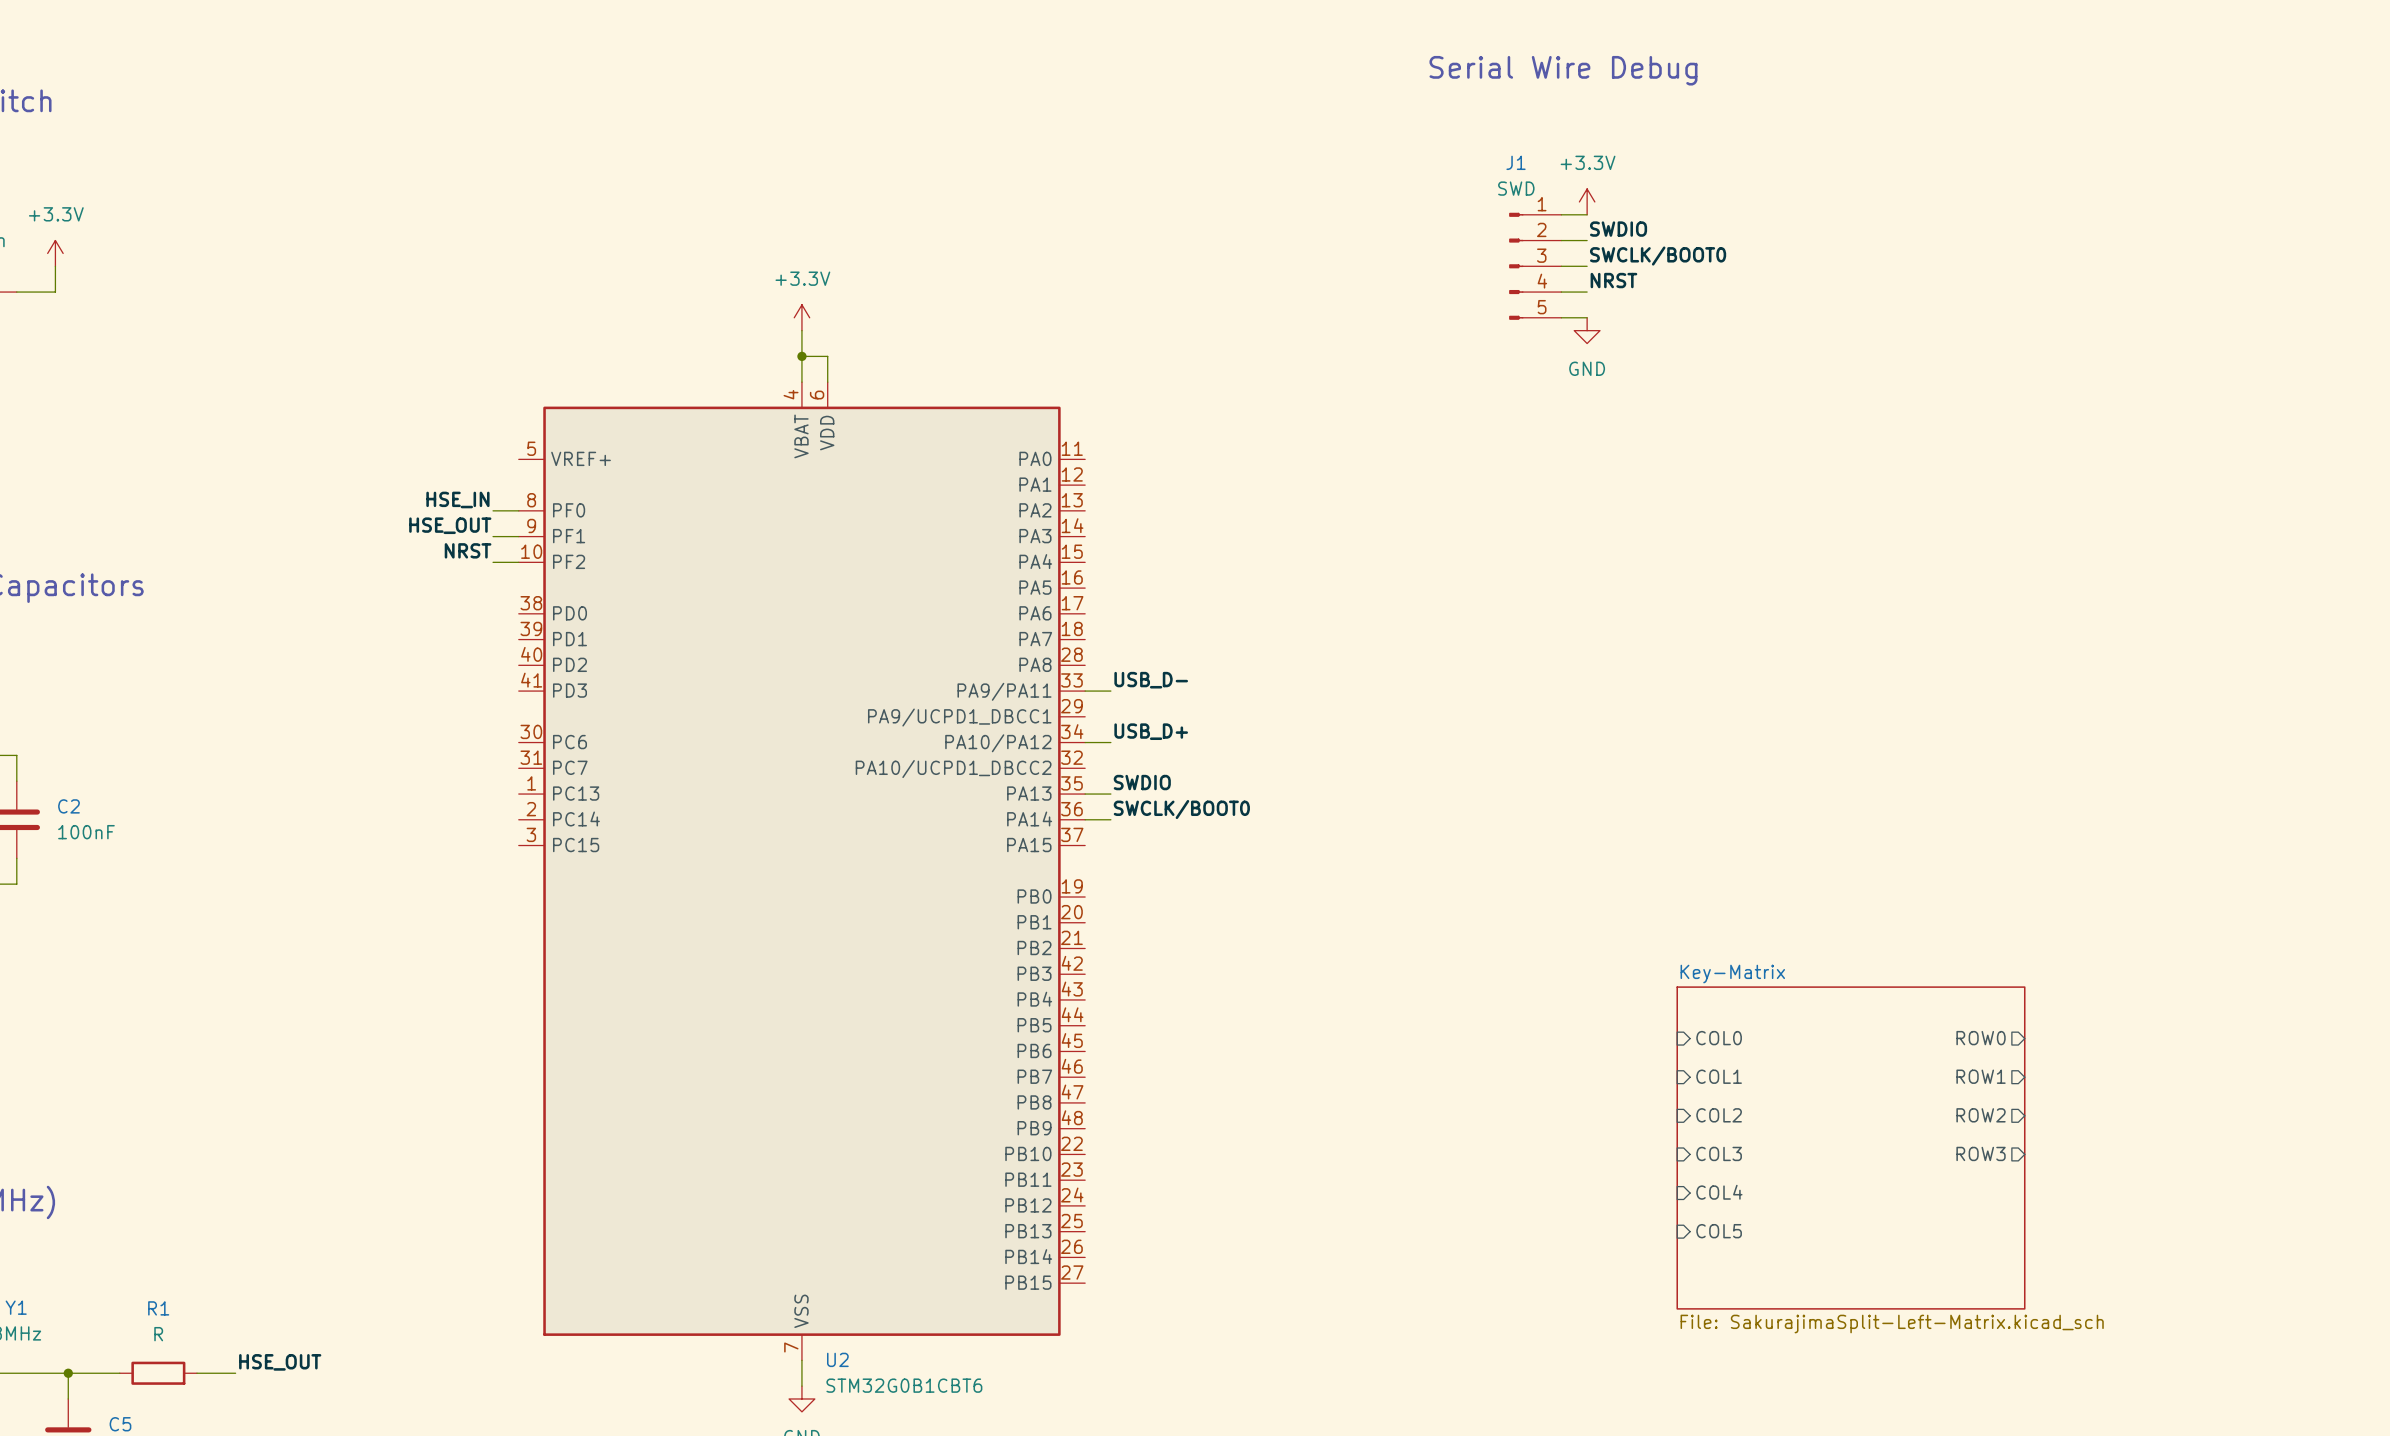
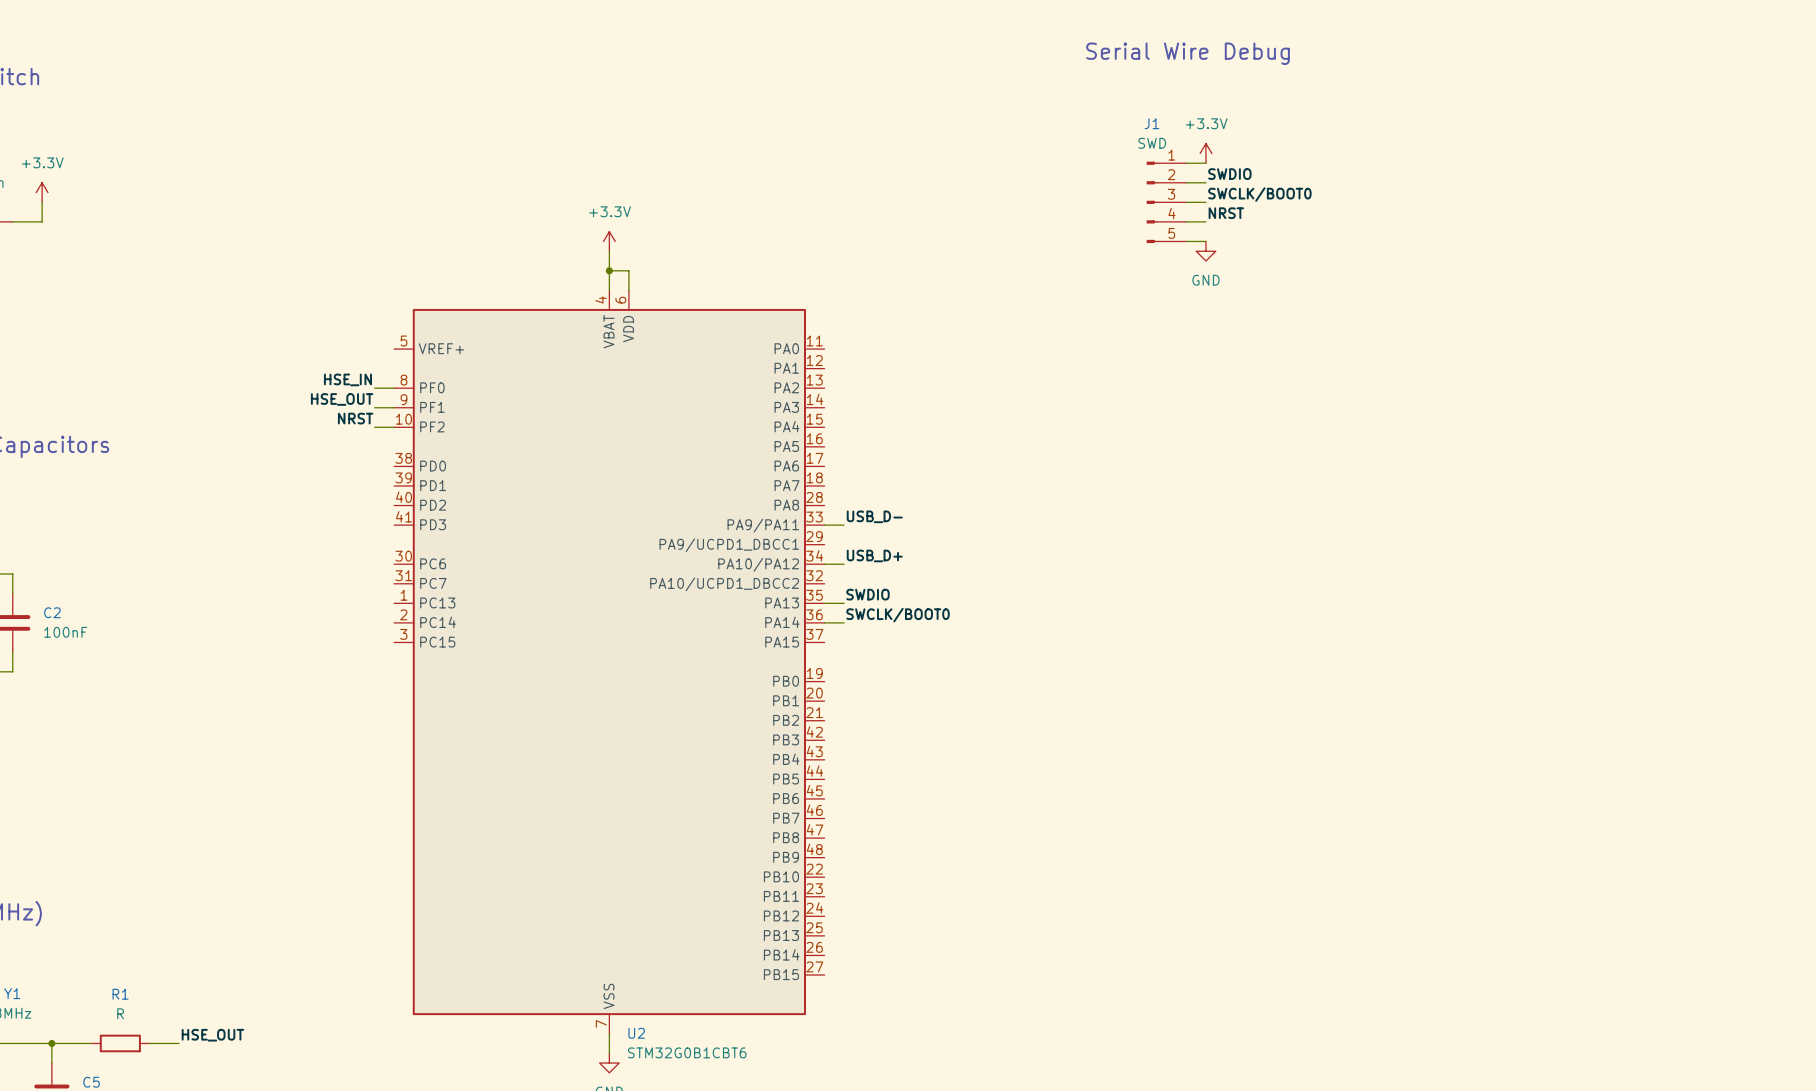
sheet pin: COL0 (1719, 1038) -> none
sheet pin: ROW0 (1981, 1038) -> none
sheet pin: COL1 (1719, 1076) -> none
sheet pin: ROW1 (1981, 1076) -> none
sheet pin: COL2 (1719, 1115) -> none
sheet pin: ROW2 (1981, 1115) -> none
sheet Key-Matrix: File: SakurajimaSplit-Left-Matrix.kicad_sch (1850, 1147) -> none
sheet pin: COL3 (1719, 1153) -> none
sheet pin: ROW3 (1981, 1153) -> none
sheet pin: COL4 (1719, 1192) -> none
sheet pin: COL5 (1719, 1231) -> none

